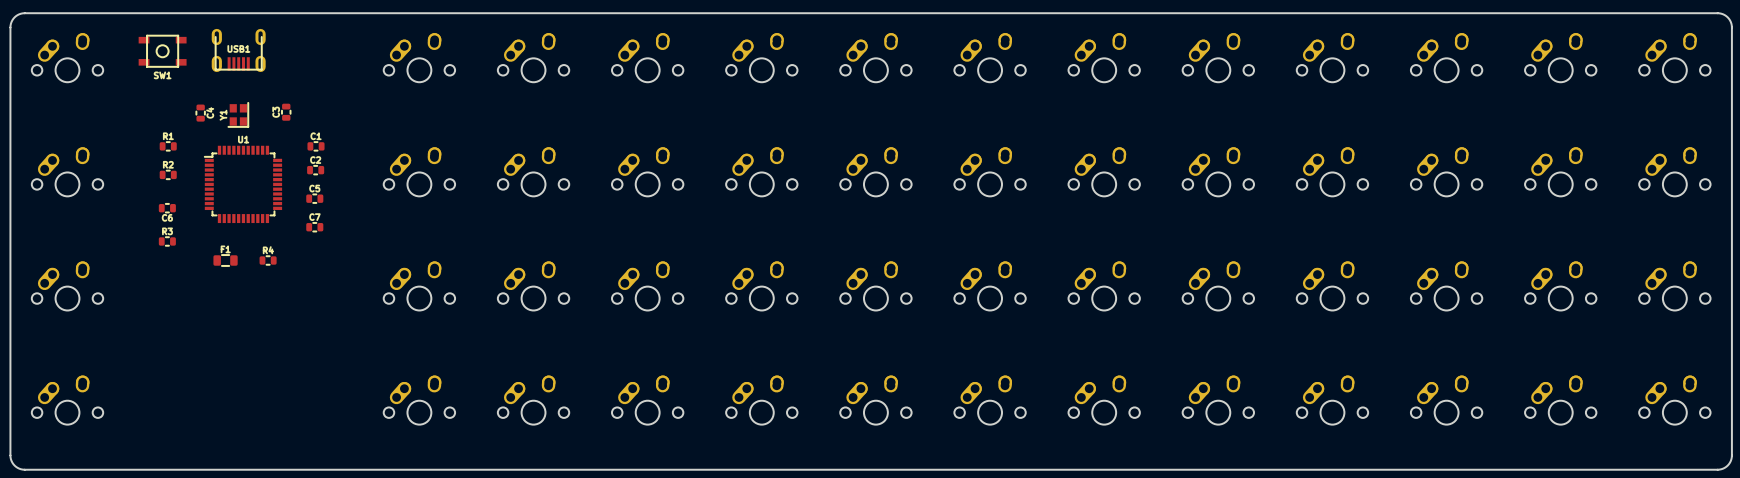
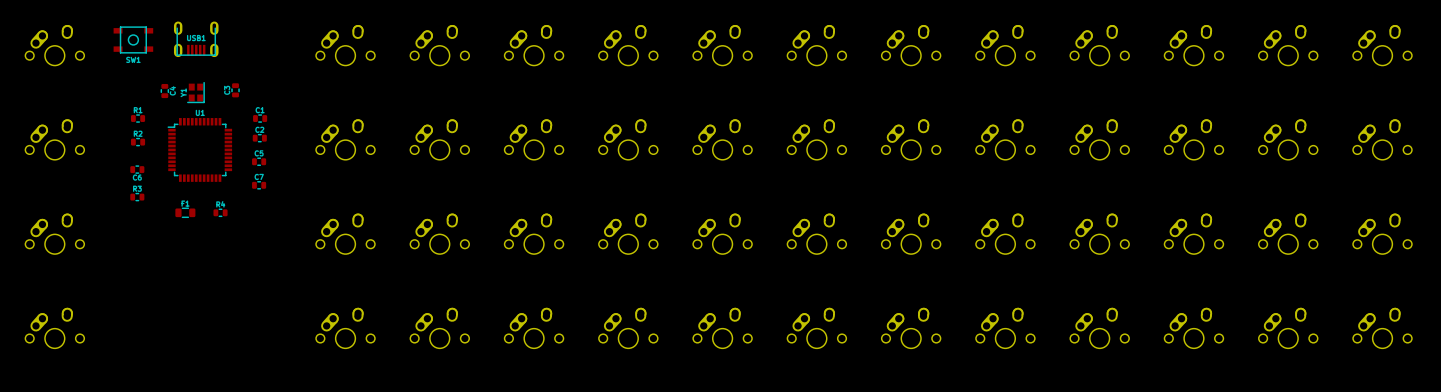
board edge: (24, 13) (1721, 13) (1728, 18) (1731, 27) (1731, 459) (1726, 466) (1717, 469) (21, 469) (13, 464) (10, 455) (10, 27) (14, 17) (24, 13) -> none

